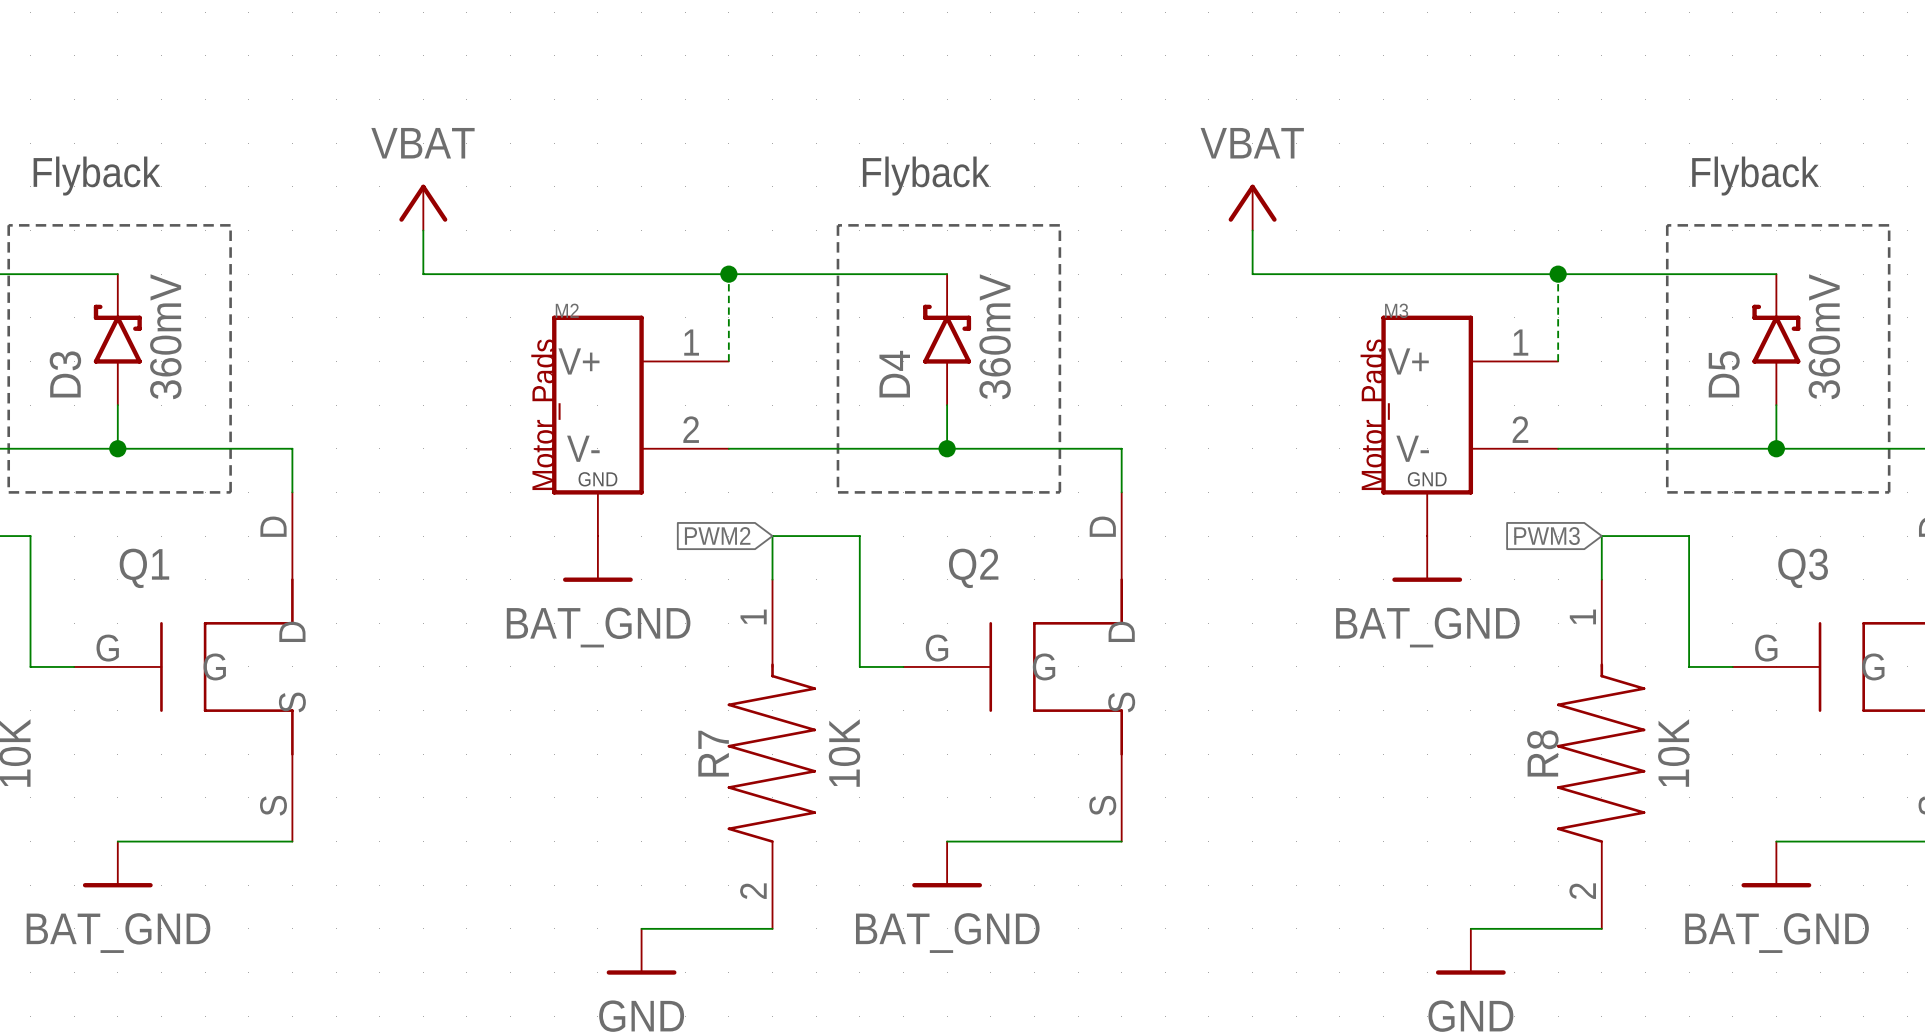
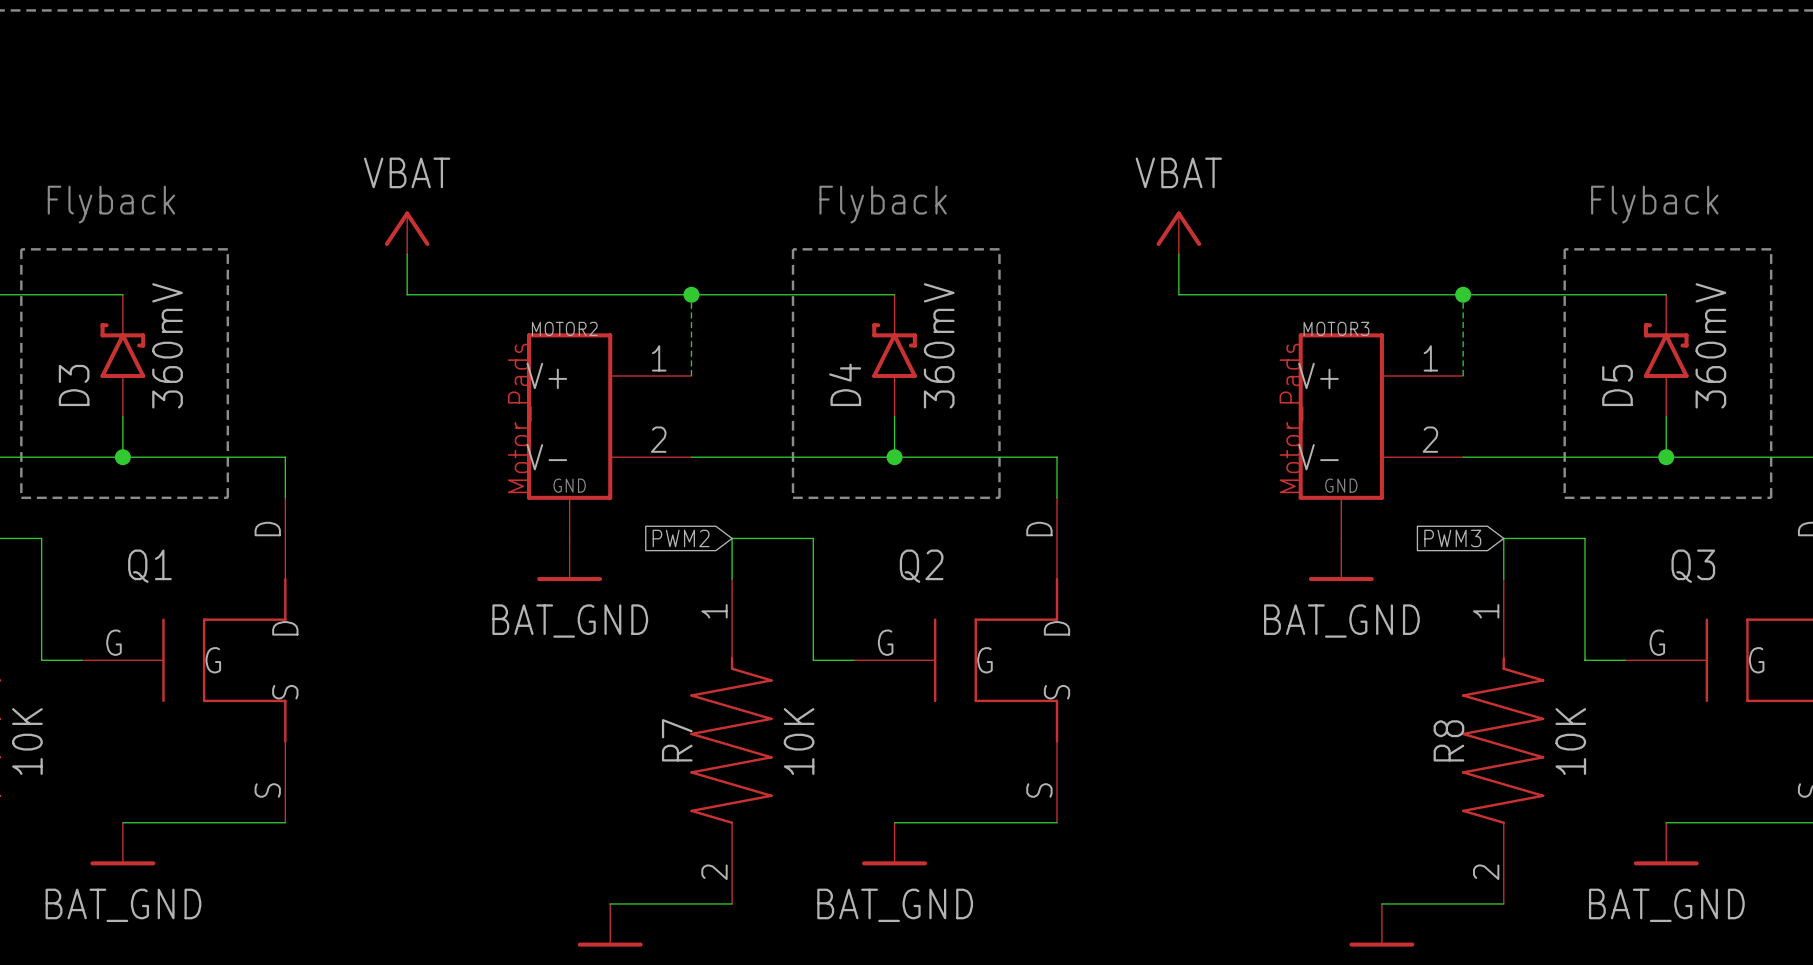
M2 name: M2 (567, 310) -> MOTOR2 (564, 328)
M3 name: M3 (1396, 310) -> MOTOR3 (1336, 328)

